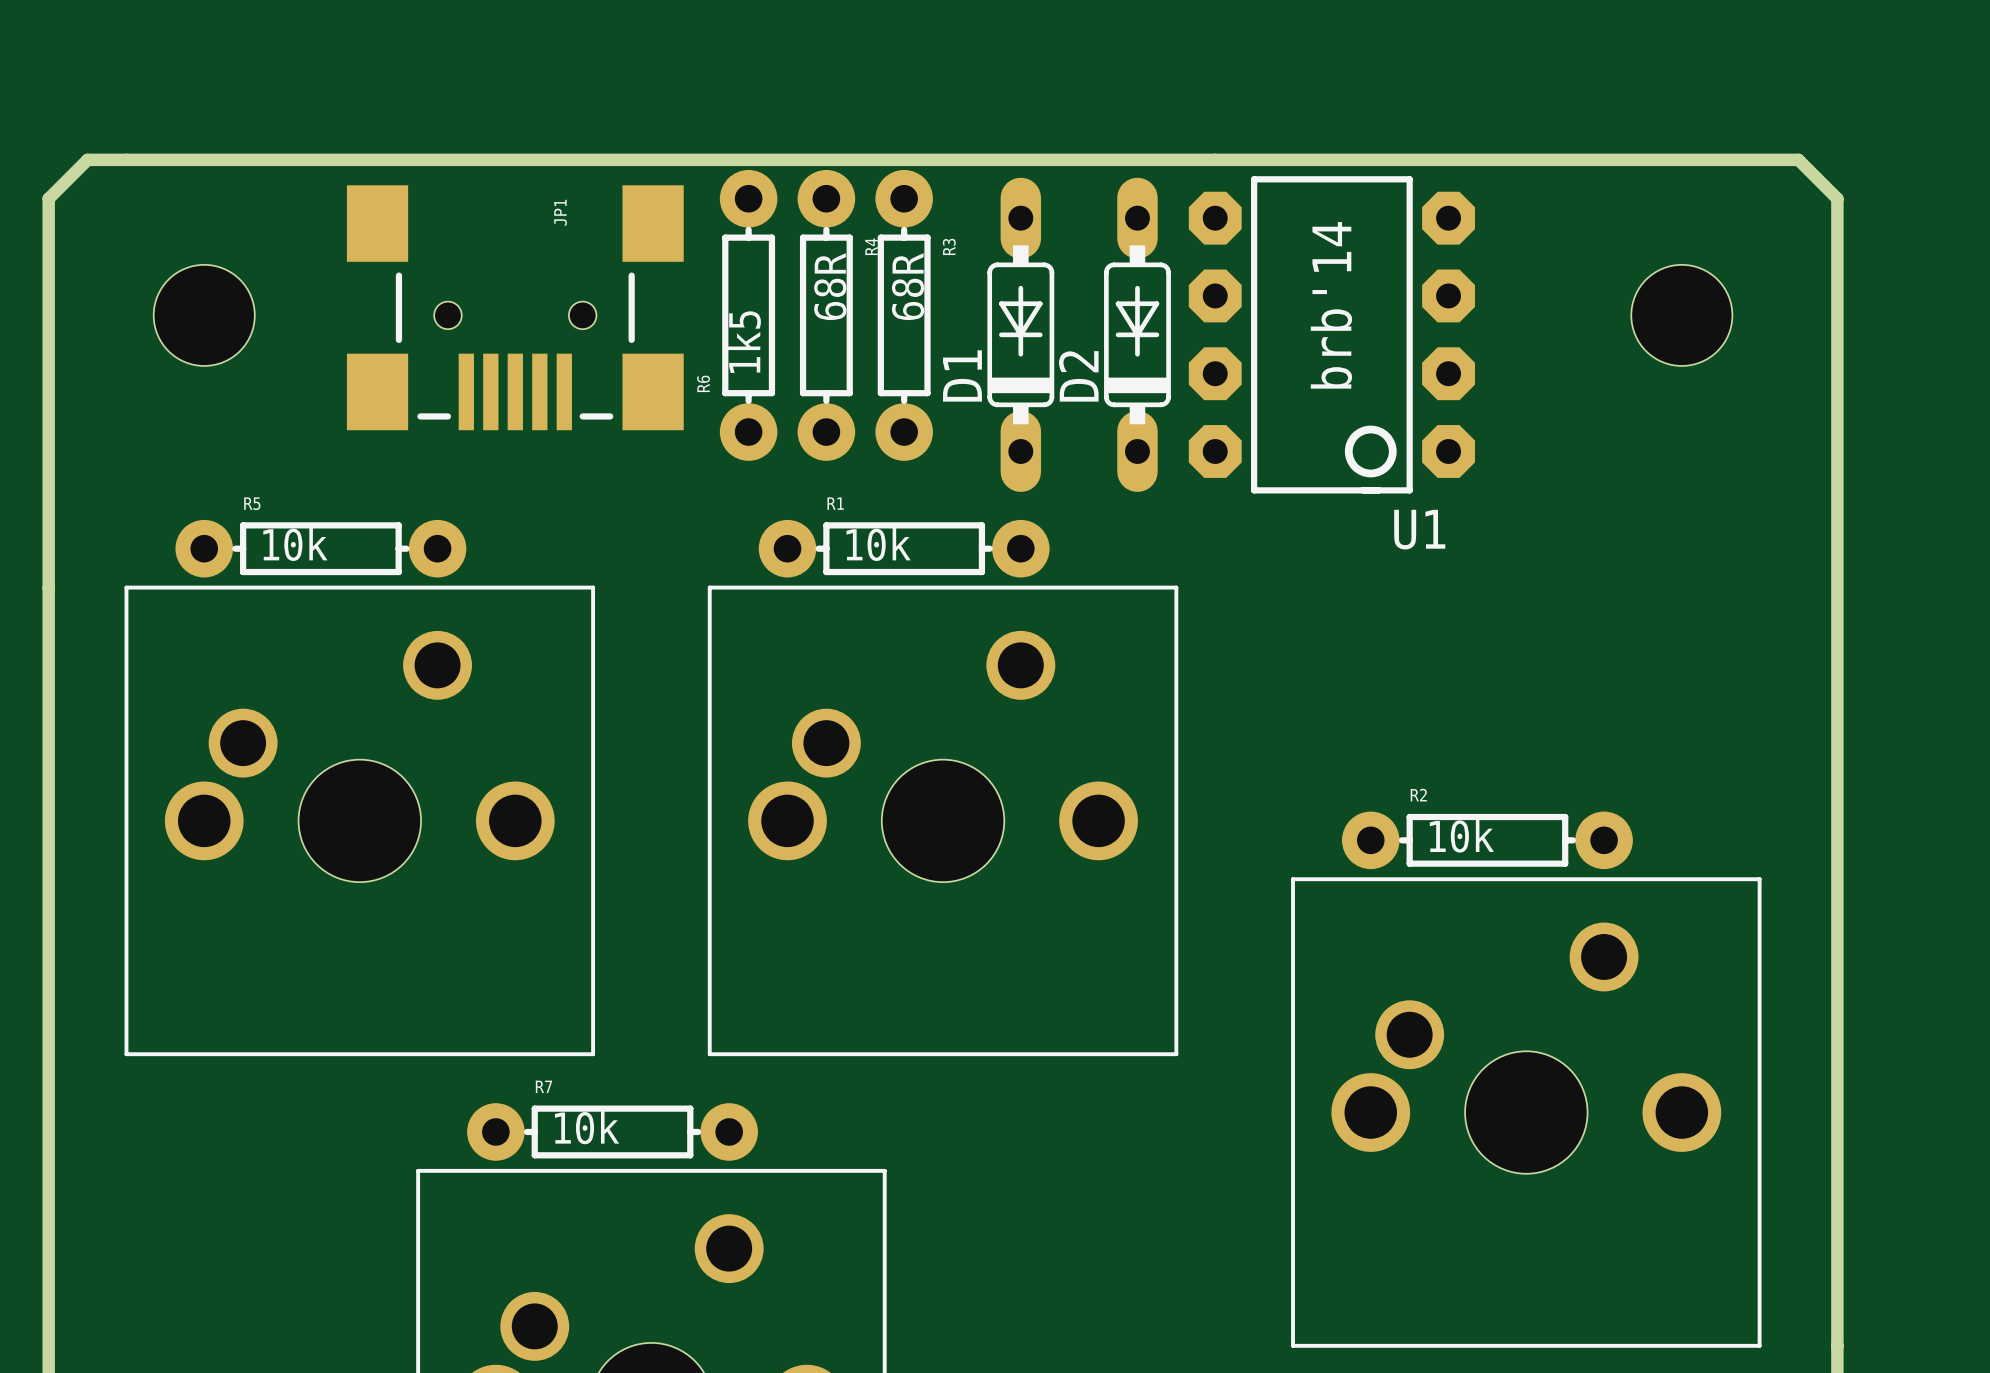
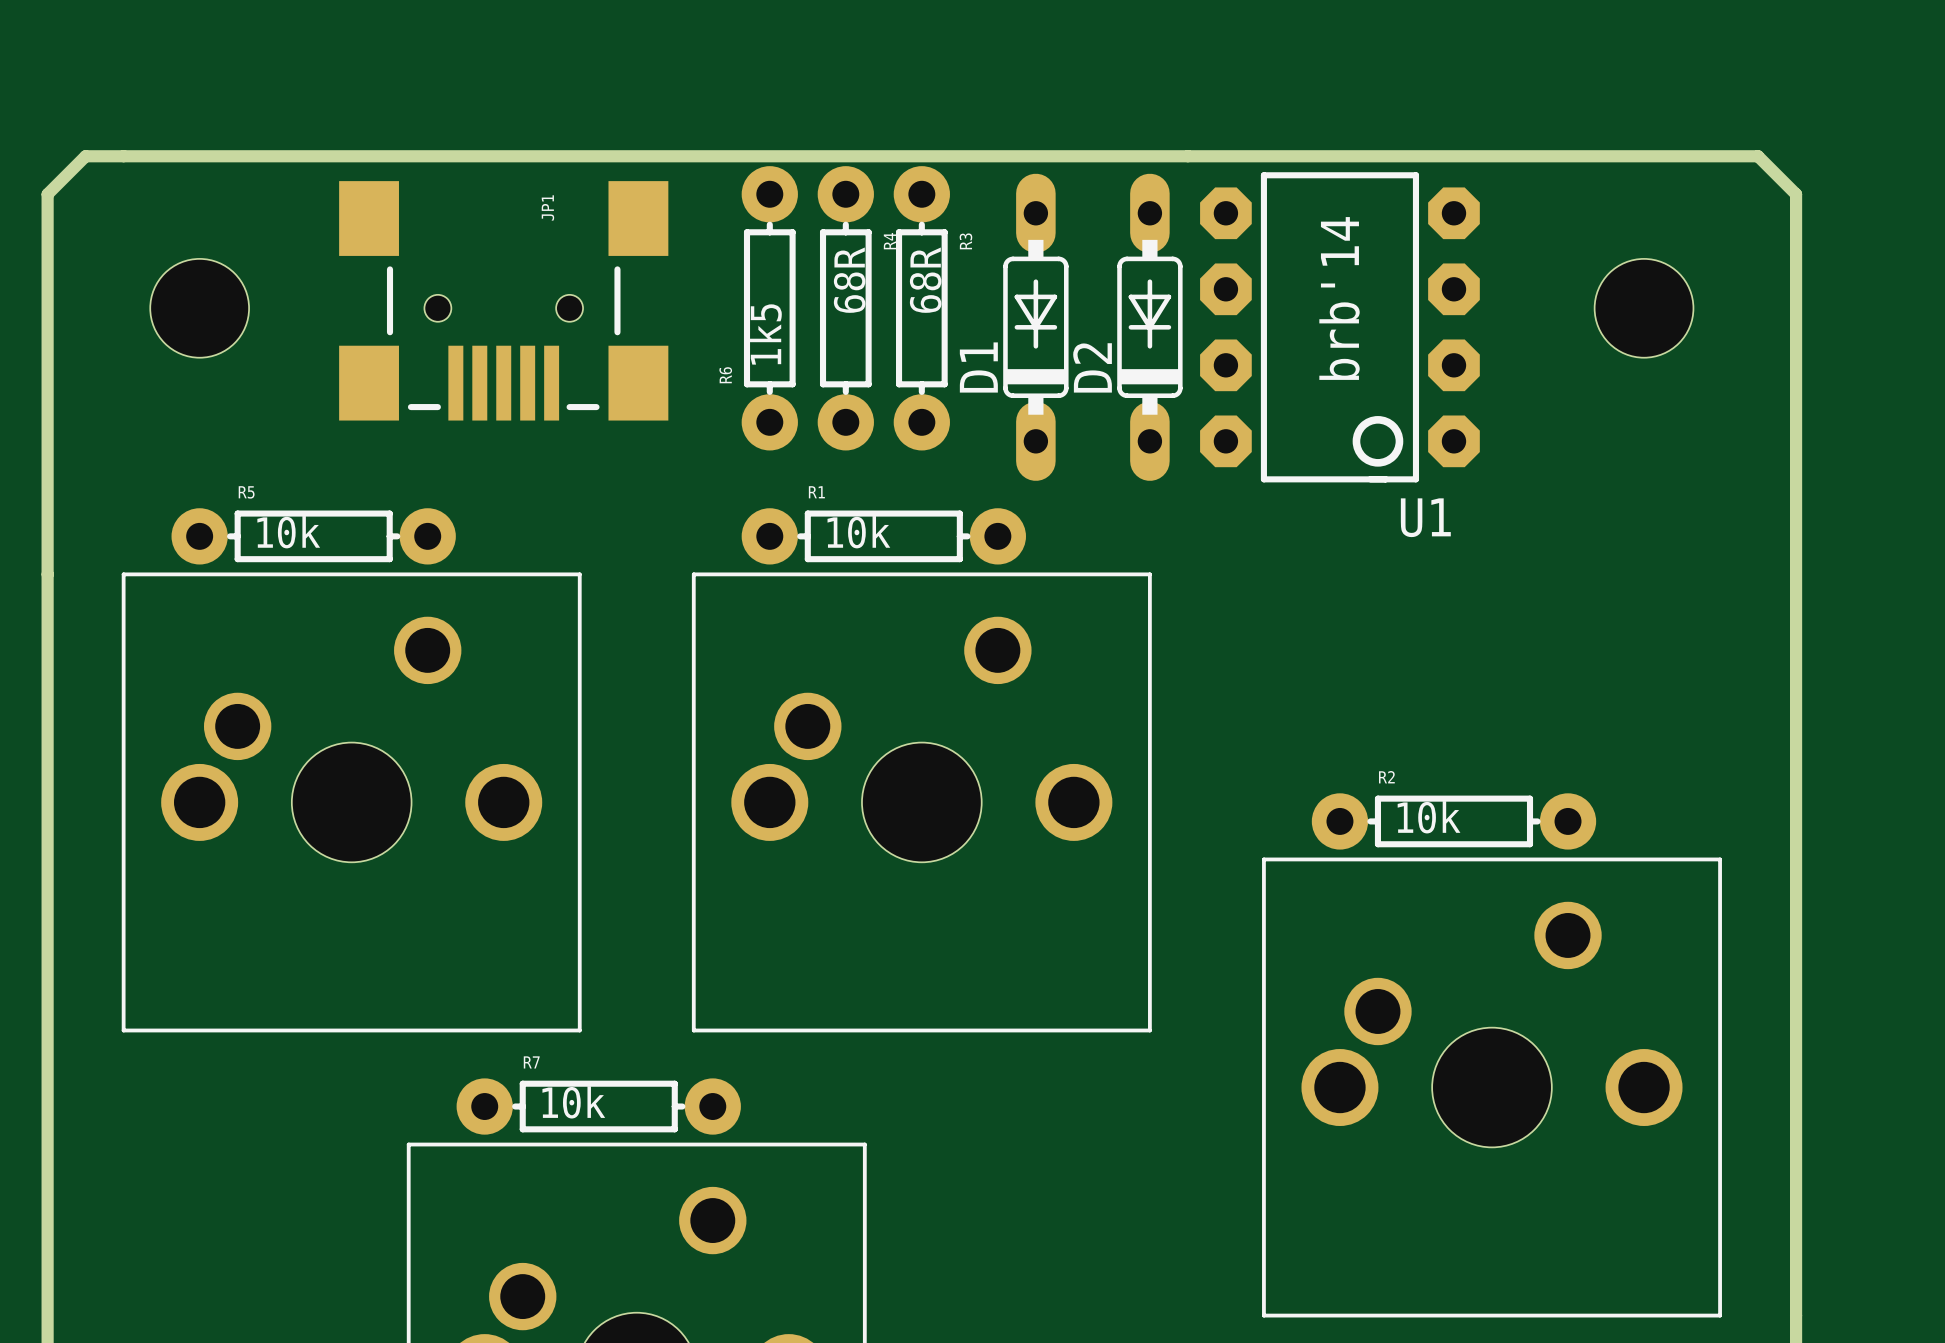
text position: brb'14 (1331, 305) -> brb'14 (1339, 298)
R6 position: (748, 315) -> (769, 308)
R4 position: (826, 315) -> (845, 308)
R3 position: (904, 315) -> (921, 308)
D1 position: (1020, 334) -> (1035, 327)
D2 position: (1137, 334) -> (1149, 327)
U1 position: (1331, 334) -> (1339, 327)

